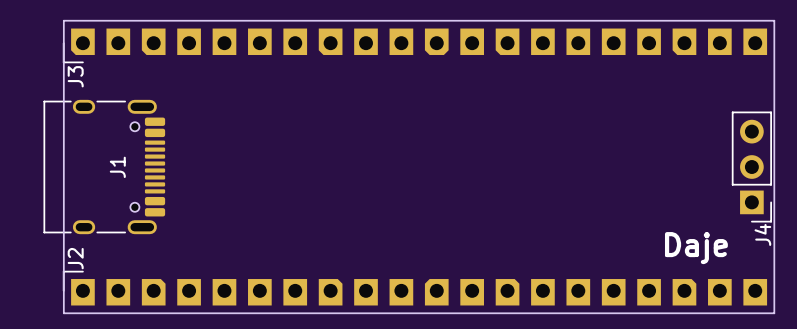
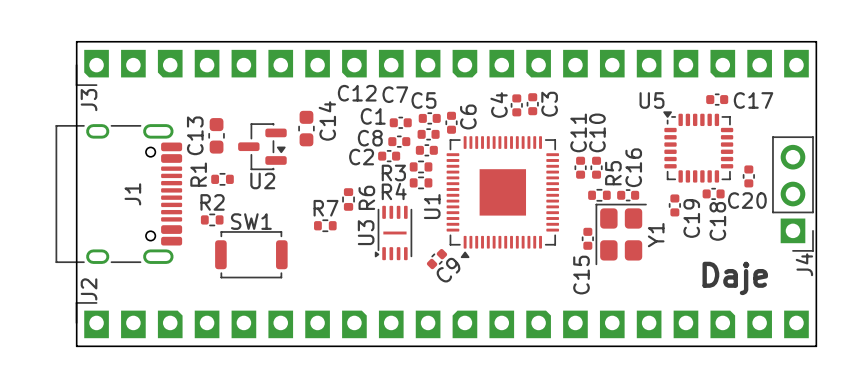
C17: none -> (717, 99)
C3: none -> (532, 104)
C4: none -> (516, 105)
C5: none -> (429, 118)
C1: none -> (400, 122)
C6: none -> (451, 122)
C14: none -> (306, 128)
C7: none -> (428, 134)
C13: none -> (216, 135)
C8: none -> (399, 141)
U2: none -> (262, 146)
U5: none -> (698, 146)
C12: none -> (426, 150)
C2: none -> (389, 156)
R3: none -> (421, 166)
C11: none -> (580, 167)
C10: none -> (596, 167)
C20: none -> (748, 176)
R1: none -> (222, 179)
R4: none -> (421, 182)
C18: none -> (713, 193)
R5: none -> (599, 195)
C16: none -> (628, 195)
U1: none -> (502, 197)
R6: none -> (348, 199)
C19: none -> (674, 205)
R2: none -> (212, 219)
R7: none -> (325, 225)
U3: none -> (393, 232)
Y1: none -> (621, 234)
C15: none -> (587, 238)
SW1: none -> (251, 254)
C9: none -> (437, 259)

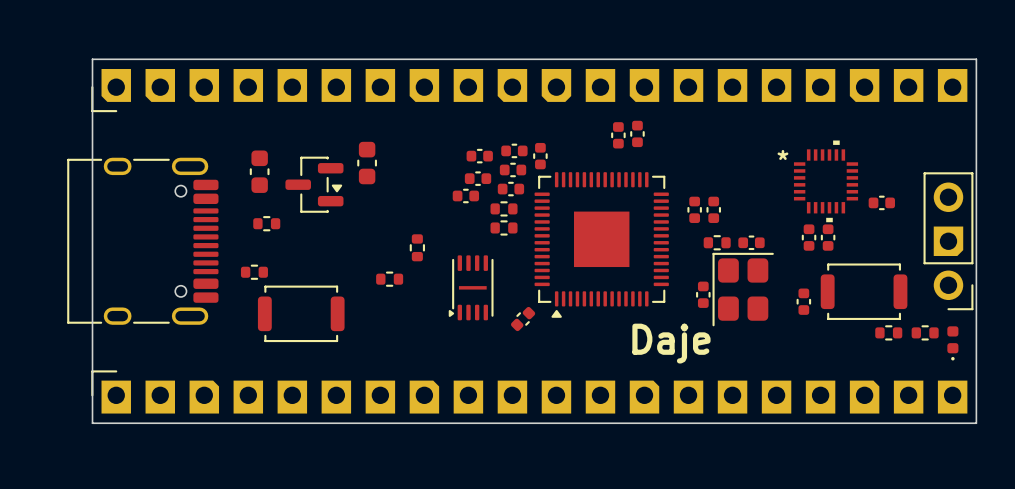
J3: (442, 67) -> none
part: none -> (529, 90)
C12 name: C12 (357, 93) -> none
C7 name: C7 (395, 94) -> none
C17: (717, 99) -> none
C5 name: C5 (423, 100) -> none
C3 name: C3 (549, 104) -> none
C4 name: C4 (499, 105) -> none
C1 name: C1 (373, 116) -> none
C6 name: C6 (468, 116) -> none
C14 name: C14 (327, 120) -> none
C11 name: C11 (578, 132) -> none
C10 name: C10 (597, 132) -> none
C13 name: C13 (195, 135) -> none
C8 name: C8 (370, 138) -> none
part: none -> (826, 181)
U5: (698, 146) -> none
C2 name: C2 (361, 157) -> none
part: none -> (881, 202)
C16 name: C16 (633, 167) -> none
R3 name: R3 (393, 172) -> none
R5 name: R5 (613, 173) -> none
R1 name: R1 (198, 174) -> none
C20: (748, 176) -> none
U2 name: U2 (262, 180) -> none
part: none -> (809, 237)
part: none -> (828, 237)
R4 name: R4 (394, 191) -> none
C18: (713, 193) -> none
J1 name: J1 (132, 194) -> none
J4: (792, 194) -> none
part: none -> (948, 241)
R6 name: R6 (366, 197) -> none
R2 name: R2 (212, 202) -> none
C19: (674, 205) -> none
U1 name: U1 (432, 206) -> none
R7 name: R7 (326, 208) -> none
SW1 name: SW1 (251, 221) -> none
U3 name: U3 (366, 232) -> none
Y1 name: Y1 (656, 235) -> none
part: none -> (864, 291)
part: none -> (803, 301)
C9 name: C9 (448, 270) -> none
part: none -> (888, 332)
part: none -> (925, 332)
C15 name: C15 (581, 275) -> none
text position: Daje (735, 278) -> Daje (671, 343)
part: none -> (952, 343)
J2: (442, 320) -> none
part: none -> (529, 391)

